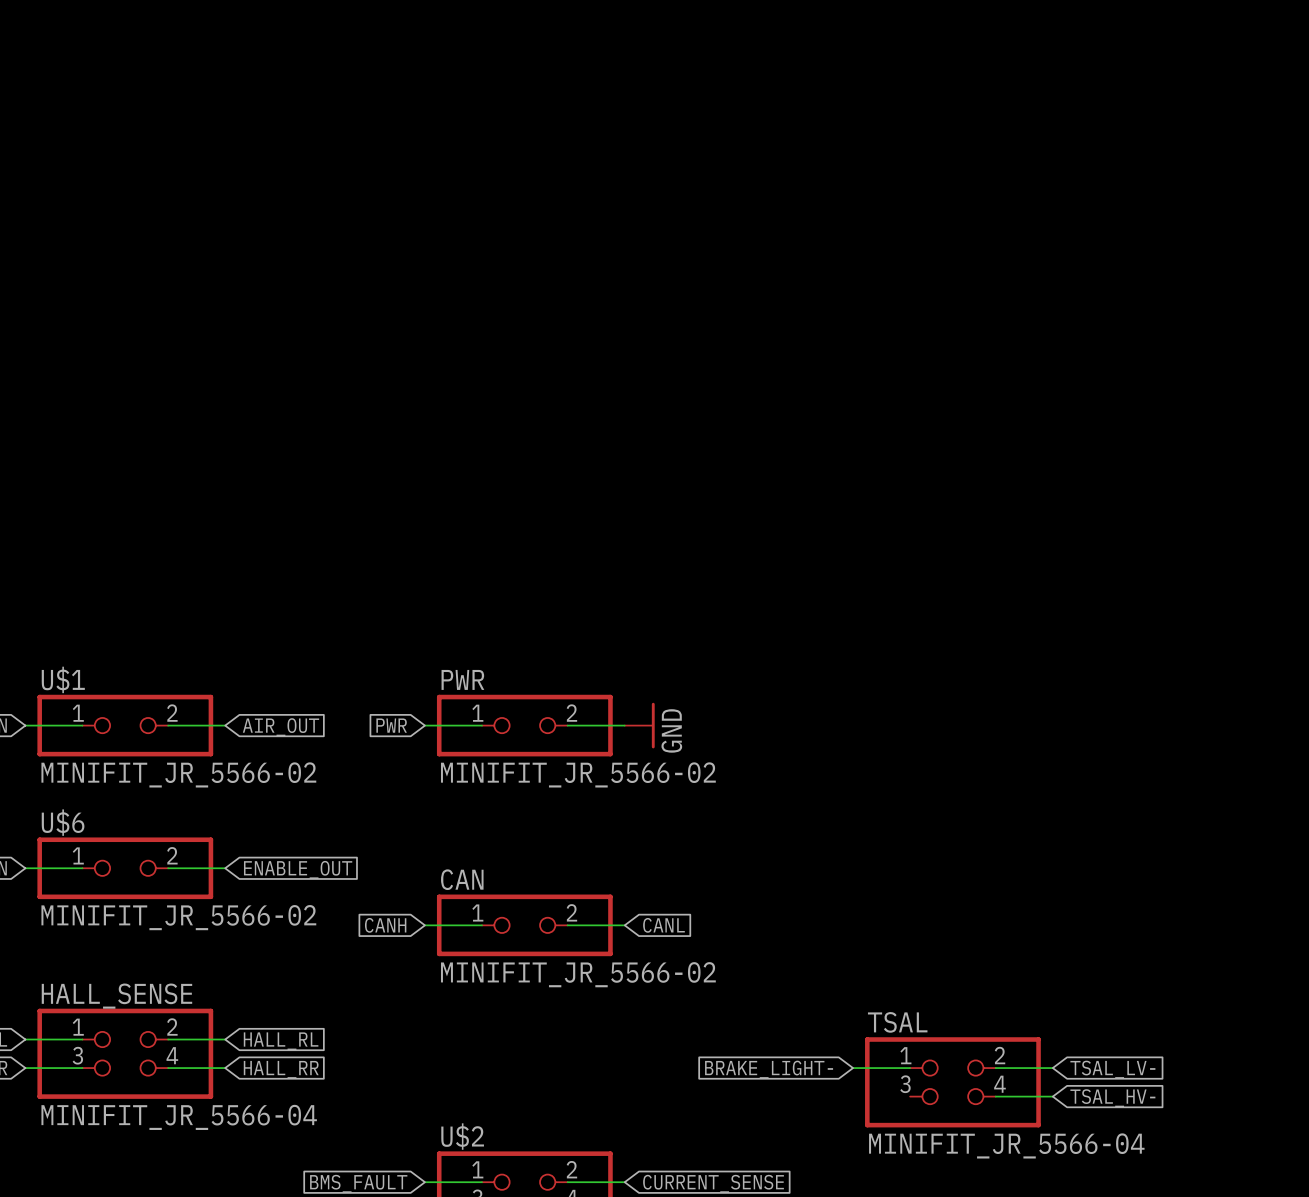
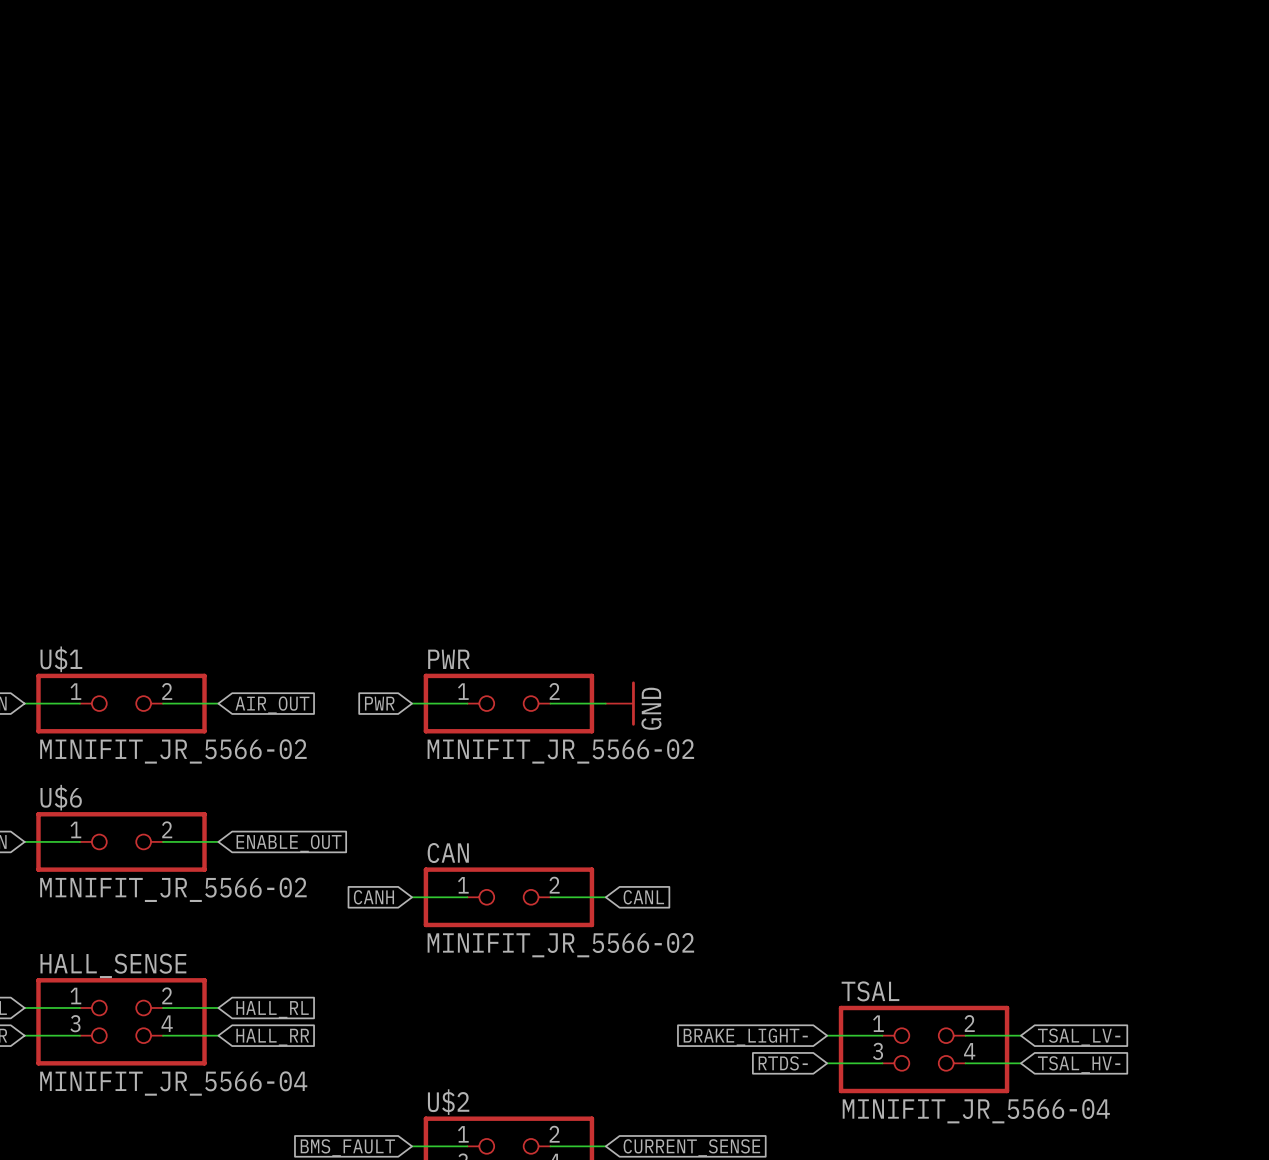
global label: none -> RTDS- (783, 1063)
wire: none -> (827, 1063) (882, 1063)

